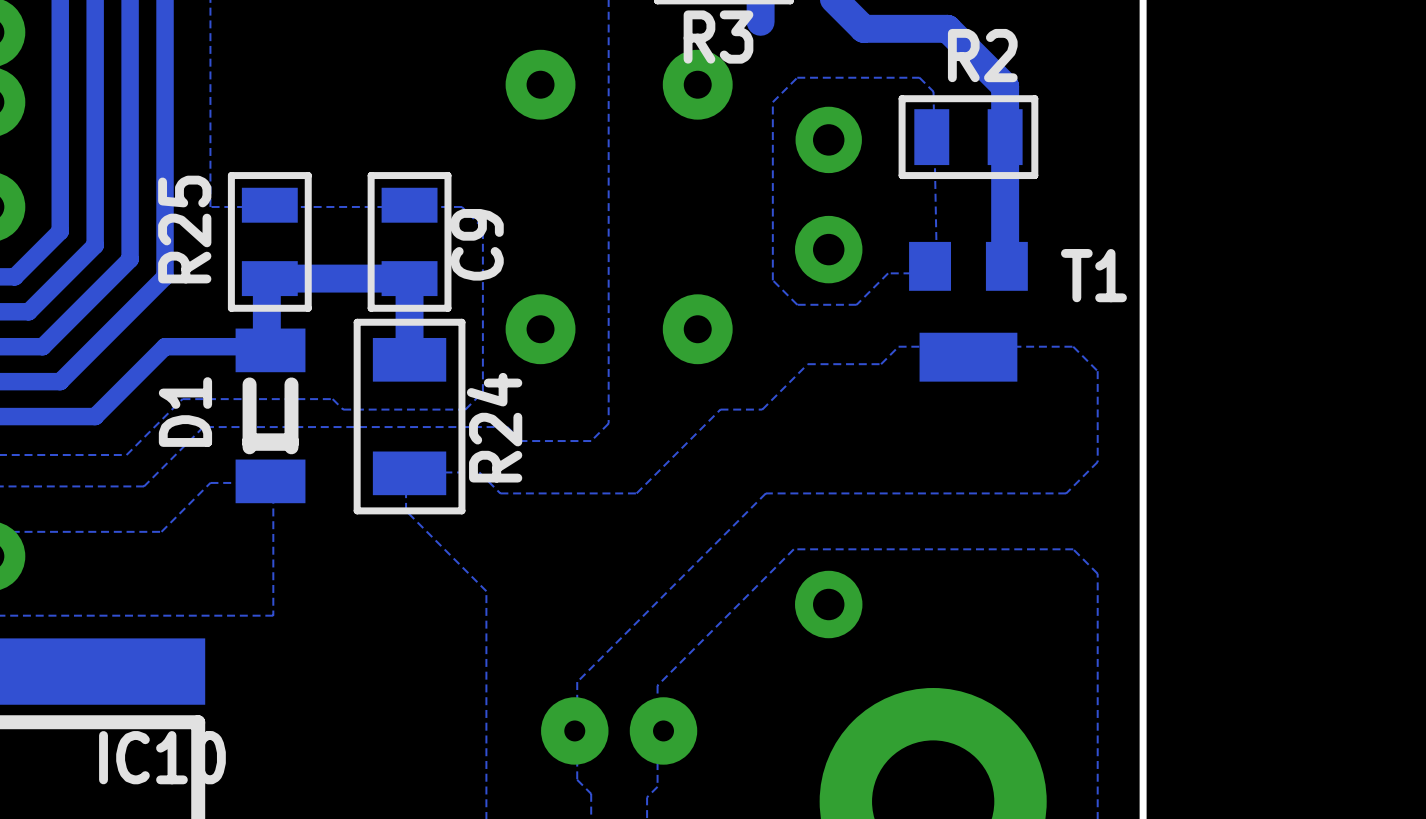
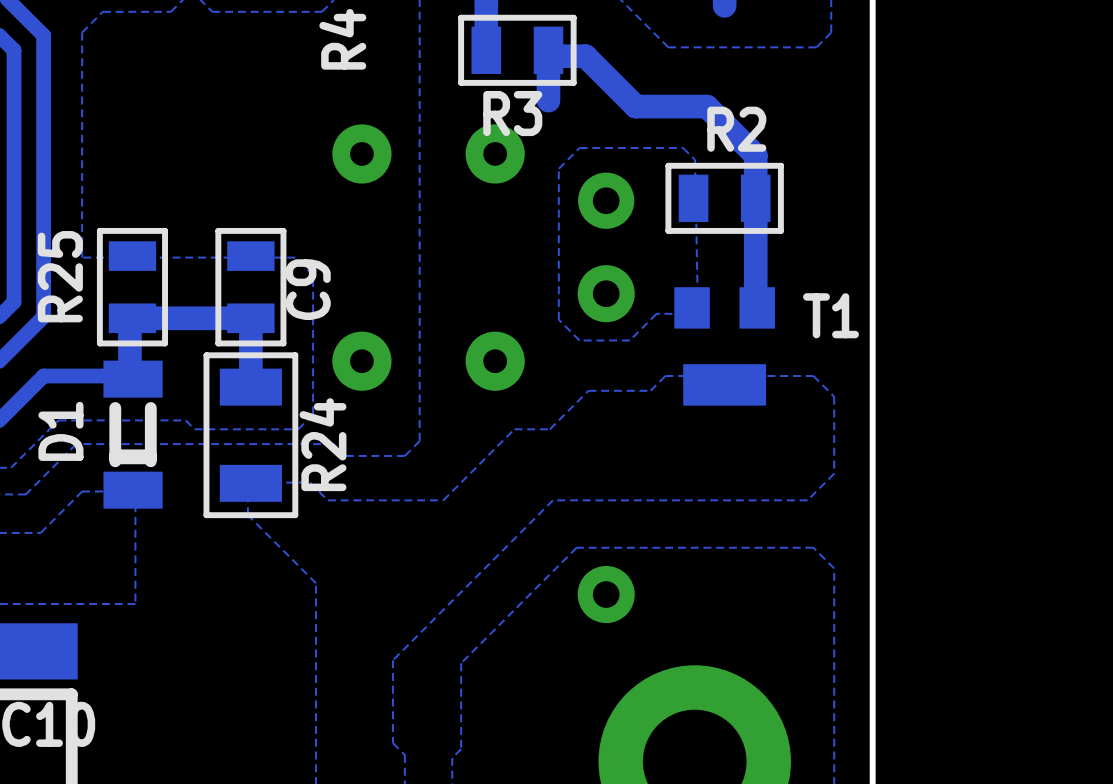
part: (619, 730) -> none

